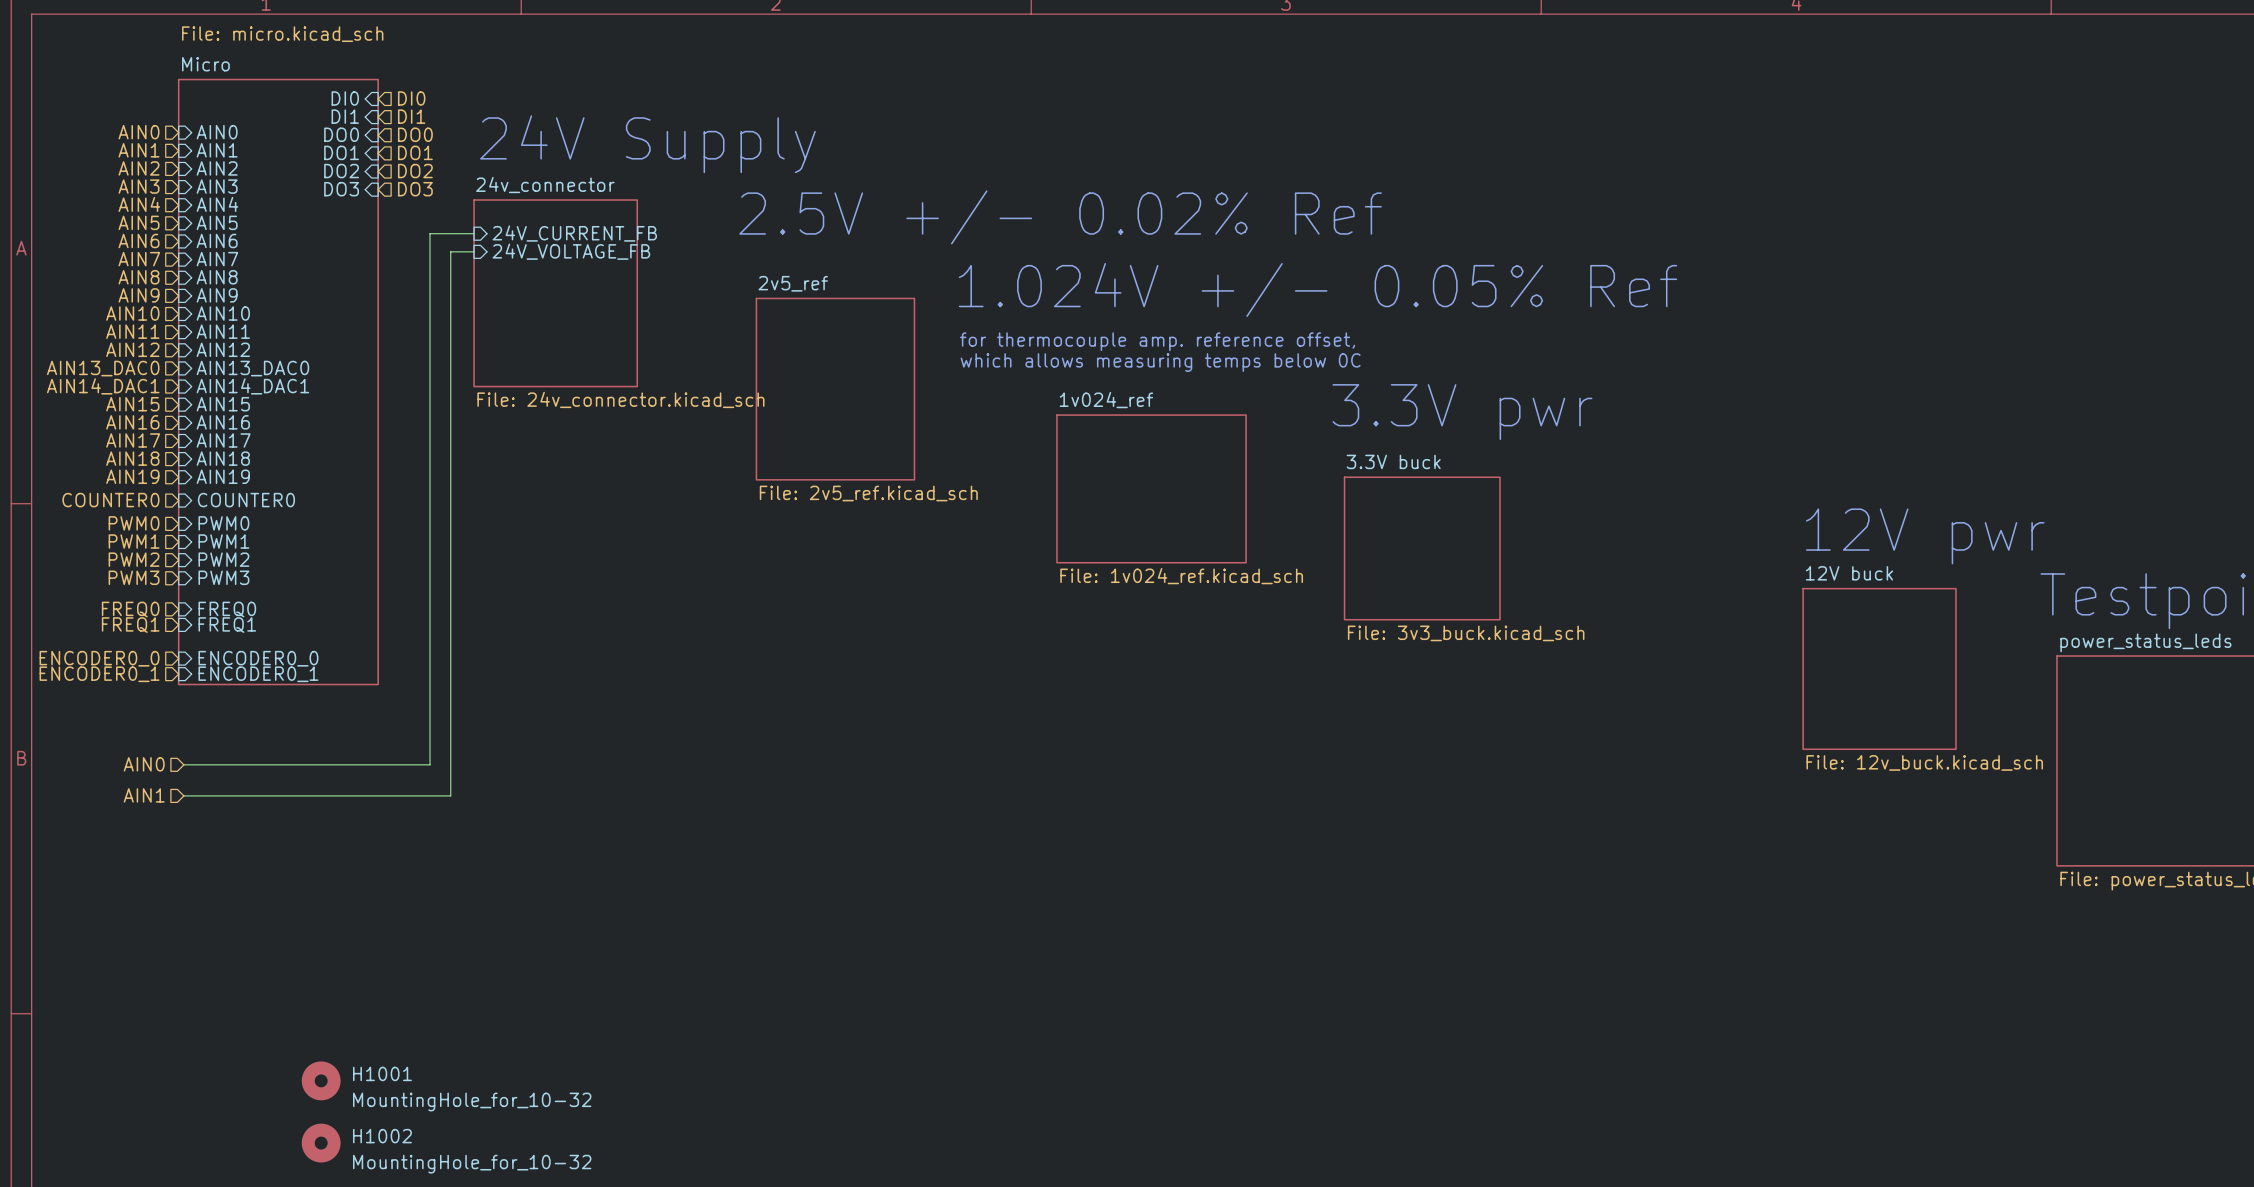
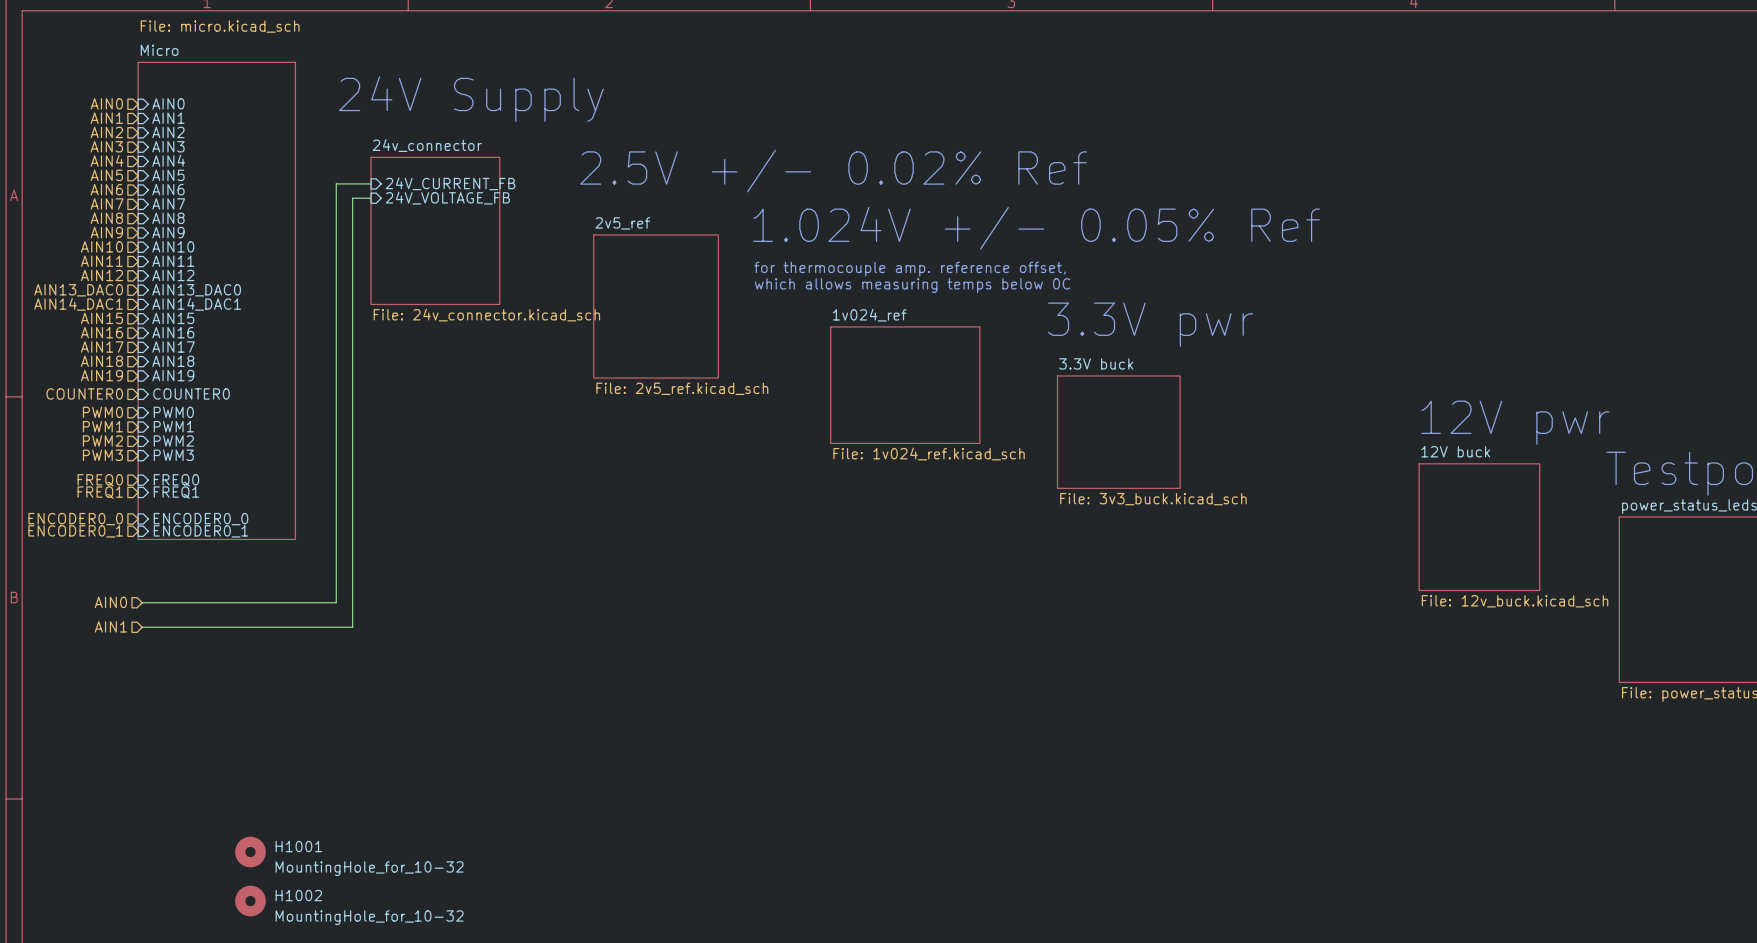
sheet pin: DI0 (345, 98) -> none
hierarchical label: DI0 (411, 98) -> none
sheet pin: DI1 (345, 116) -> none
hierarchical label: DI1 (411, 116) -> none
sheet pin: DO0 (341, 134) -> none
hierarchical label: DO0 (415, 134) -> none
text position: 24V Supply (647, 144) -> 24V Supply (471, 99)
sheet pin: DO1 (341, 152) -> none
hierarchical label: DO1 (415, 152) -> none
sheet pin: DO2 (341, 171) -> none
hierarchical label: DO2 (415, 171) -> none
sheet pin: DO3 (341, 189) -> none
hierarchical label: DO3 (415, 189) -> none

